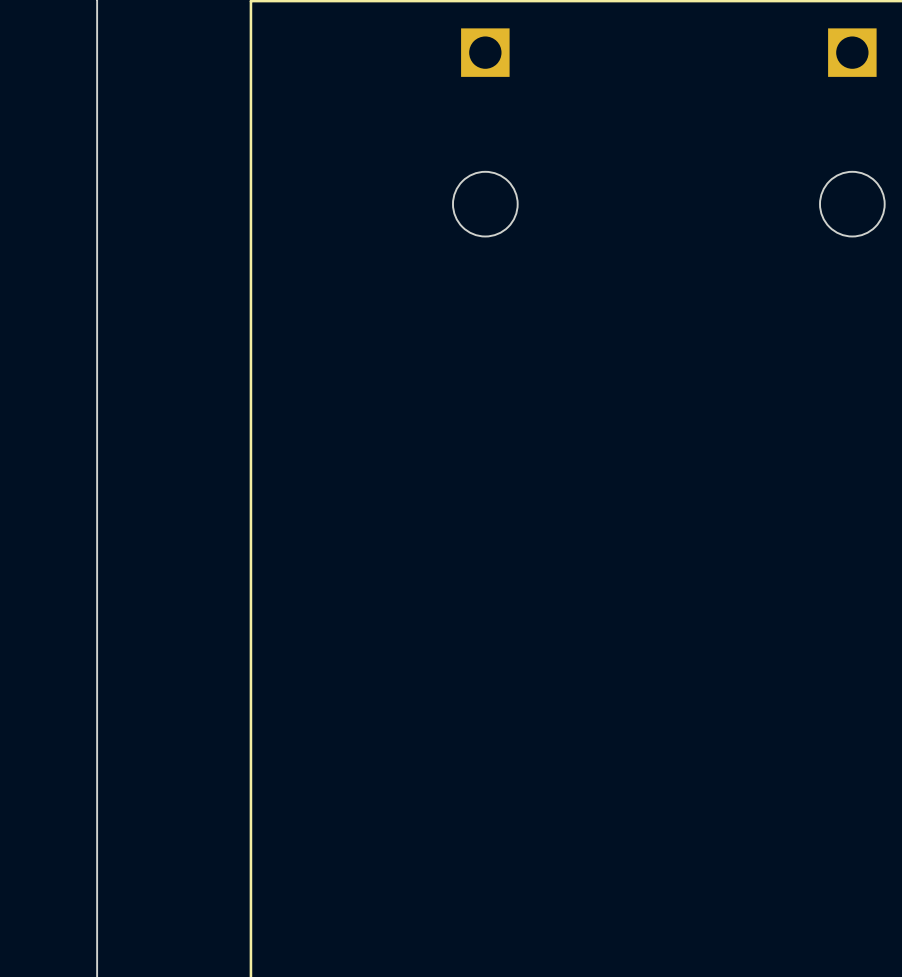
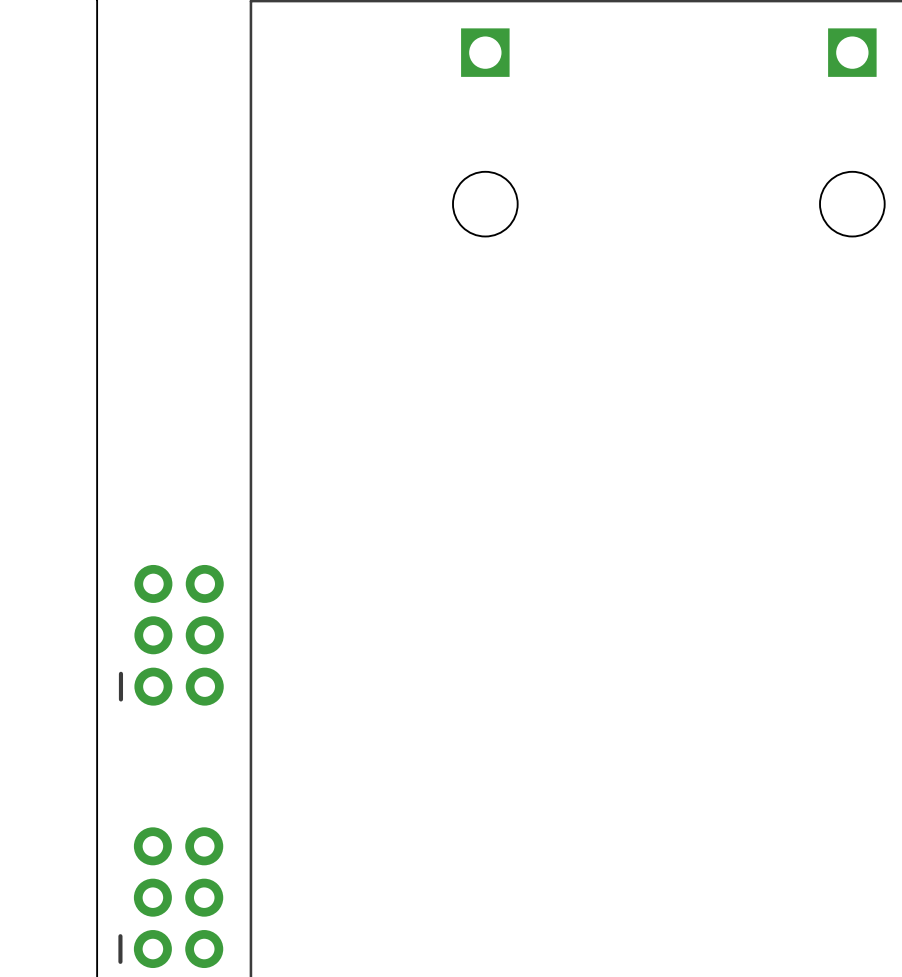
part: none -> (171, 635)
part: none -> (170, 897)

